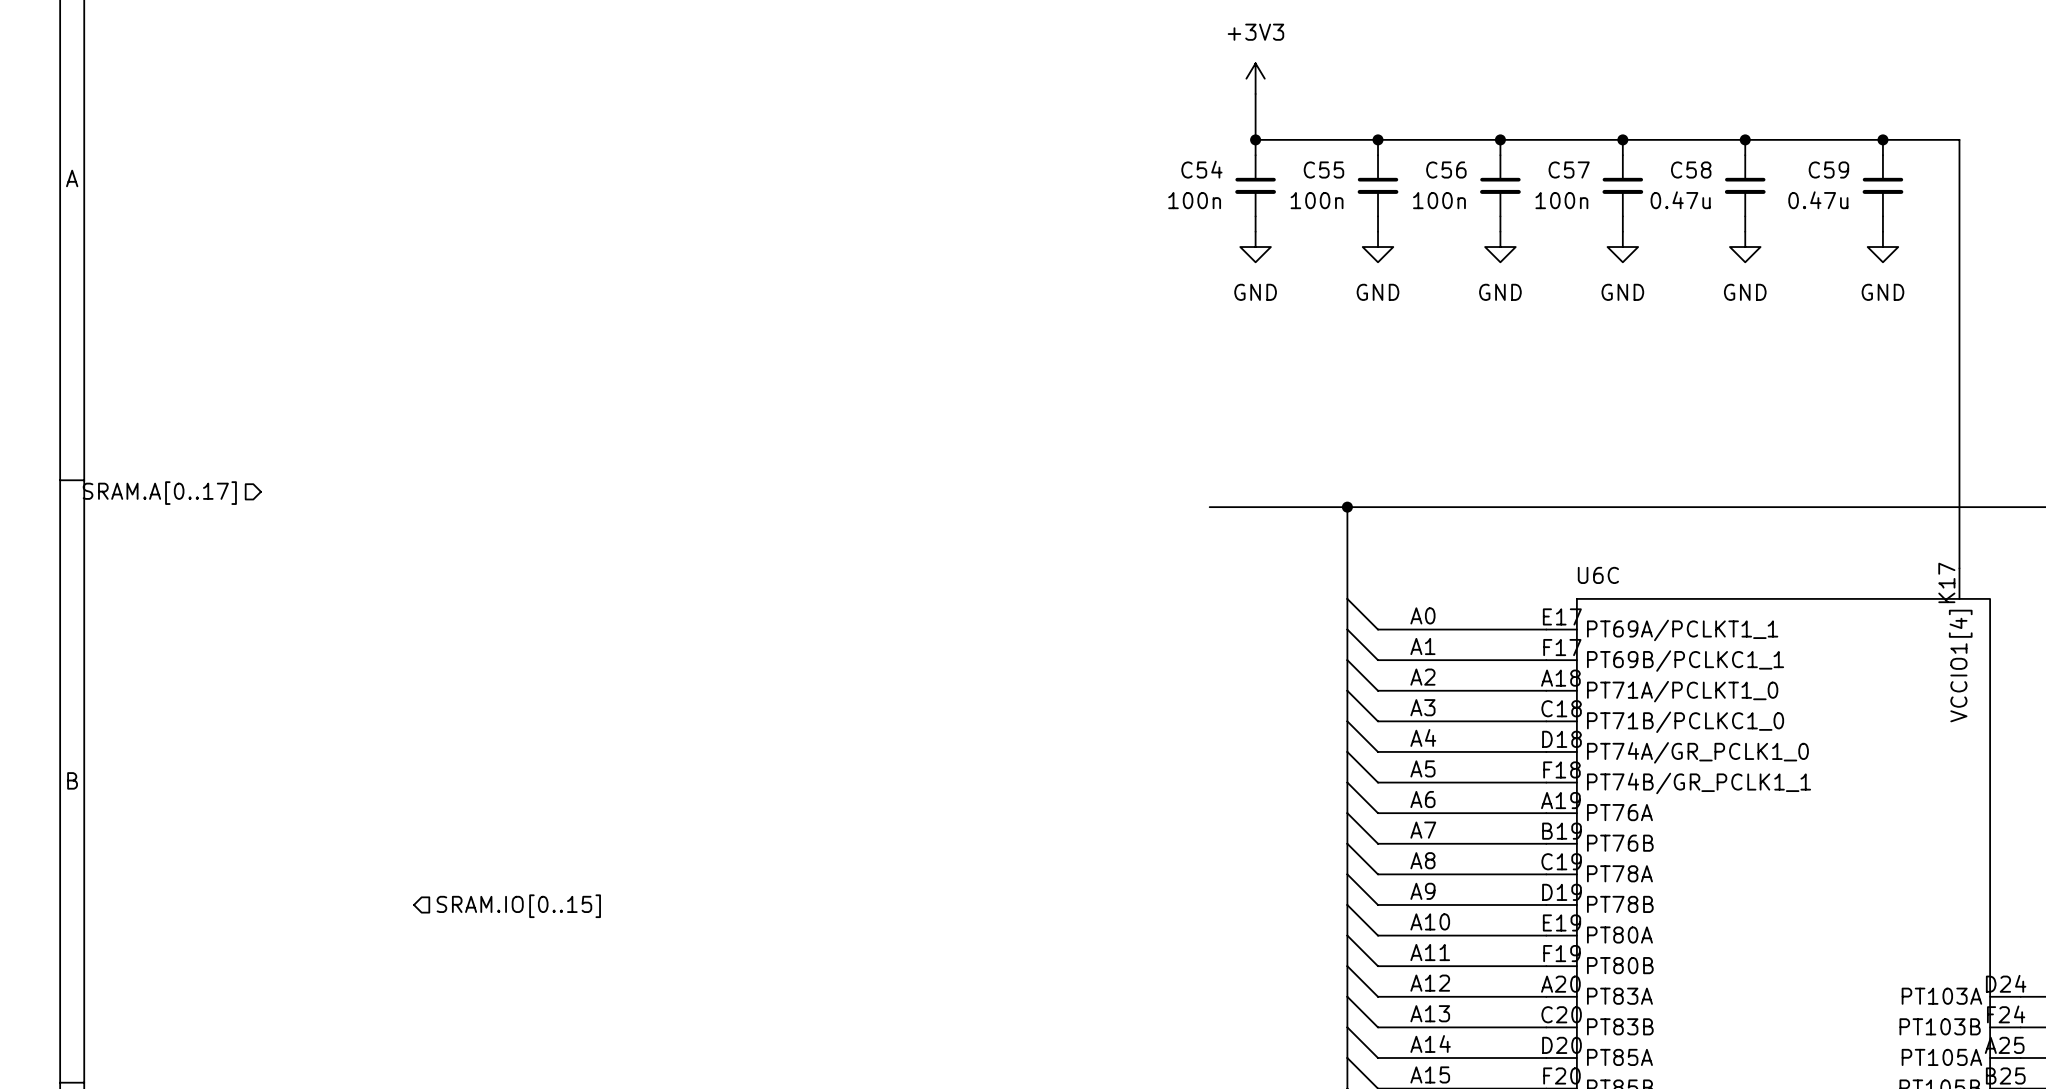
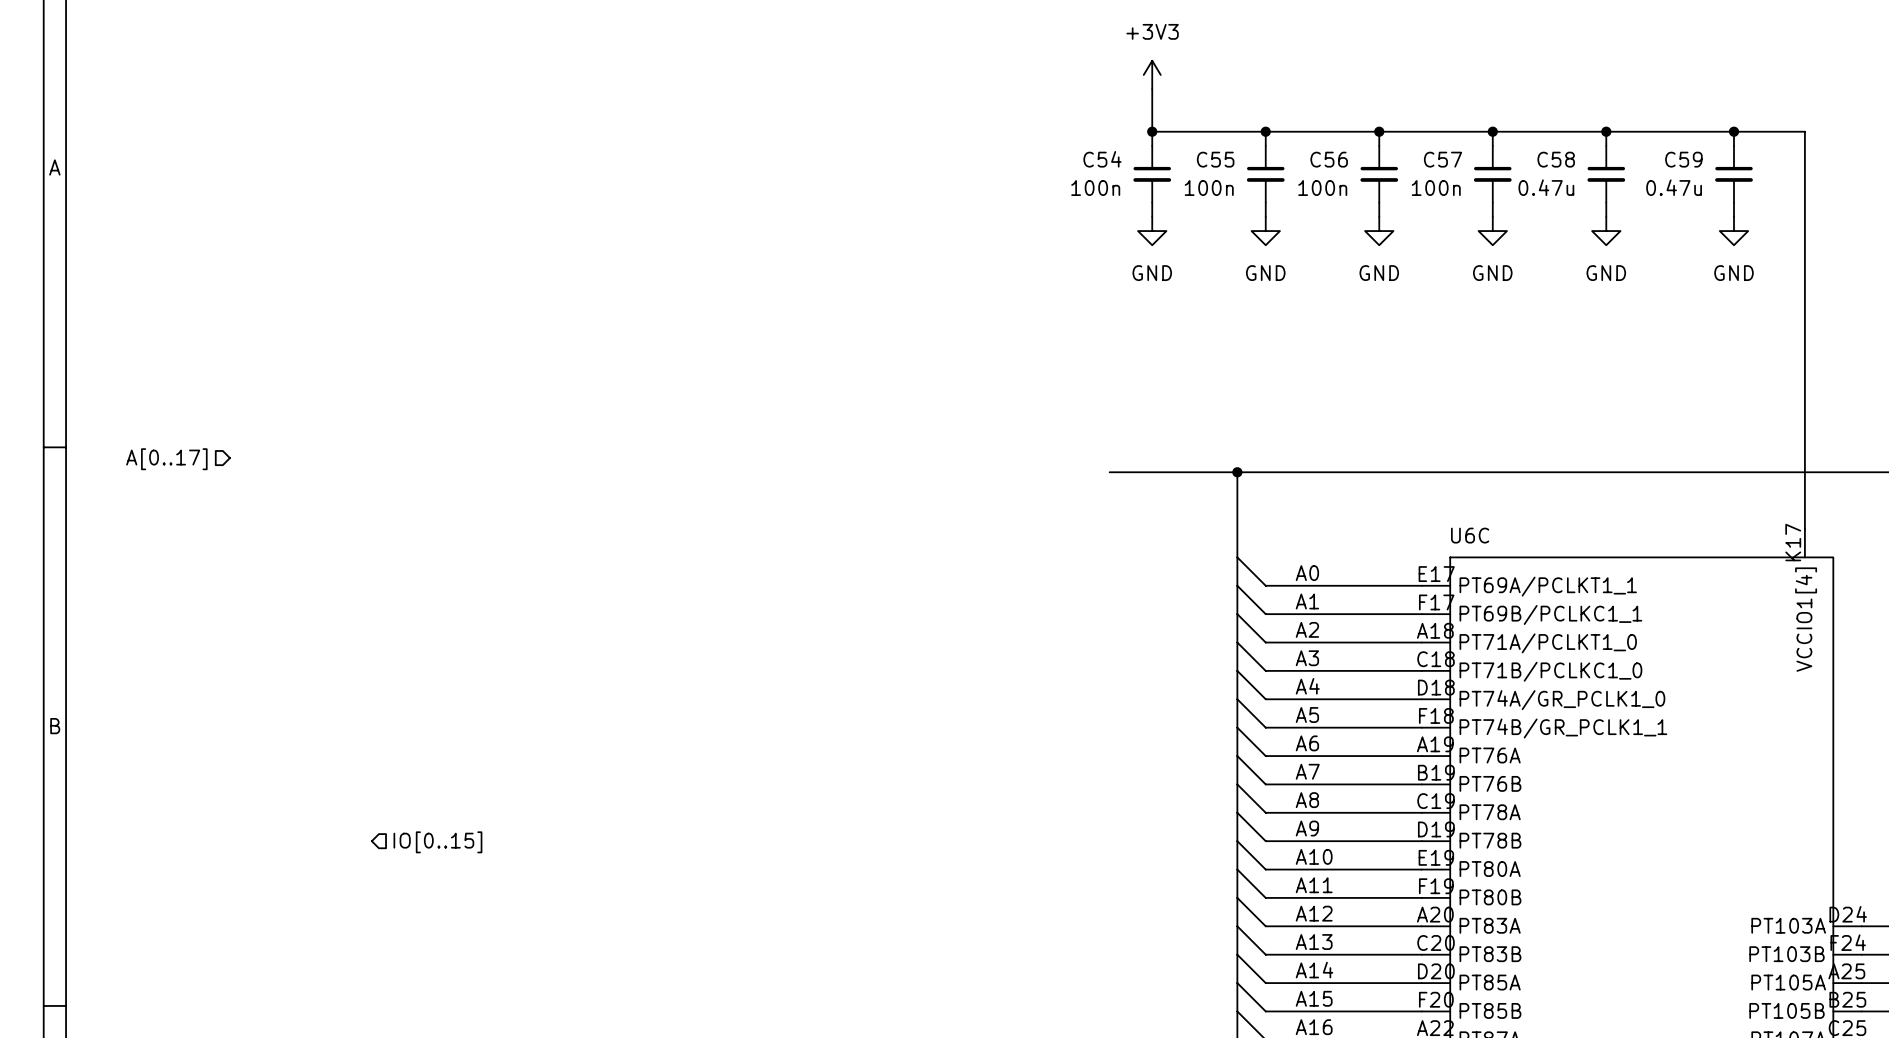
hierarchical label: SRAM.A[0..17] (159, 493) -> A[0..17] (166, 459)
hierarchical label: SRAM.IO[0..15] (518, 906) -> IO[0..15] (437, 842)

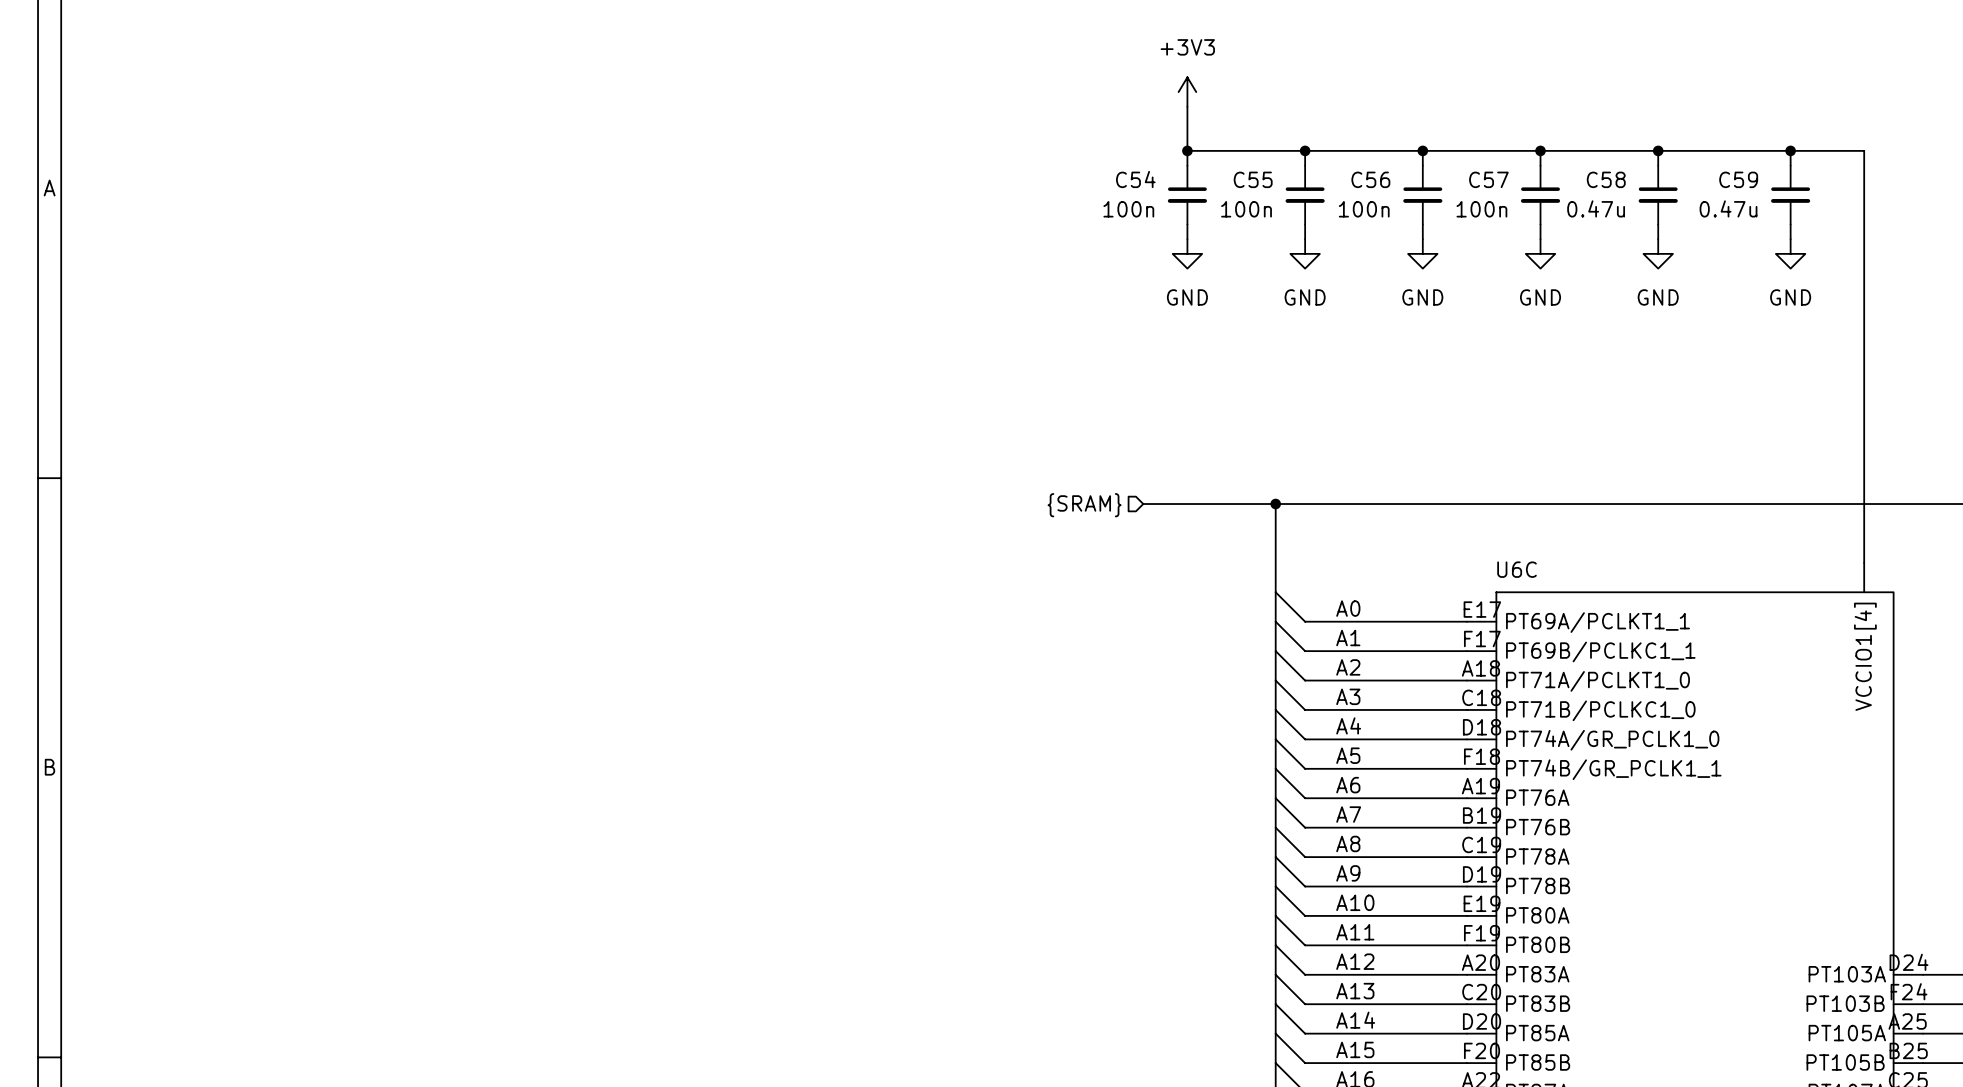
hierarchical label: A[0..17] (166, 459) -> none
hierarchical label: none -> {SRAM} (1084, 505)
U6C pin number: K17 (1793, 542) -> none
hierarchical label: IO[0..15] (437, 842) -> none

